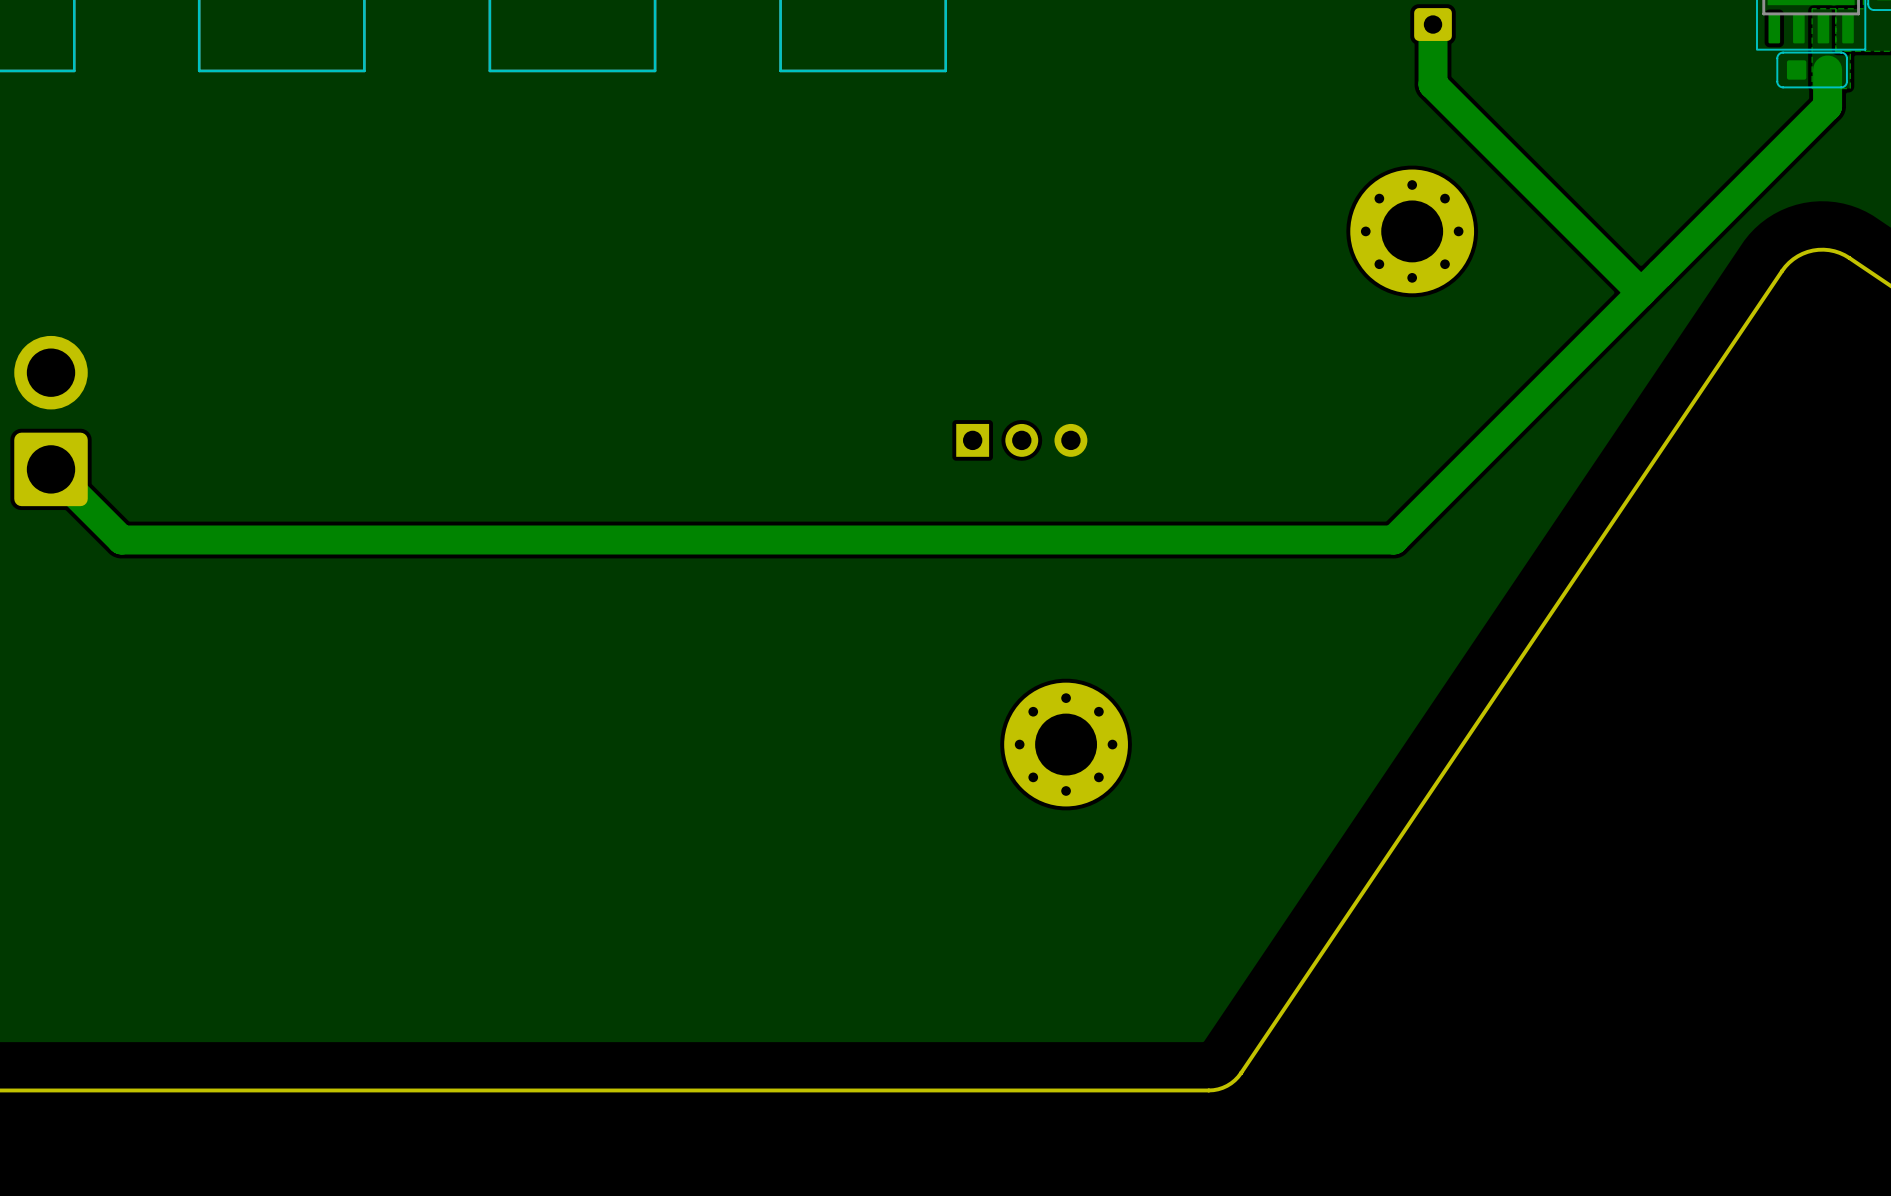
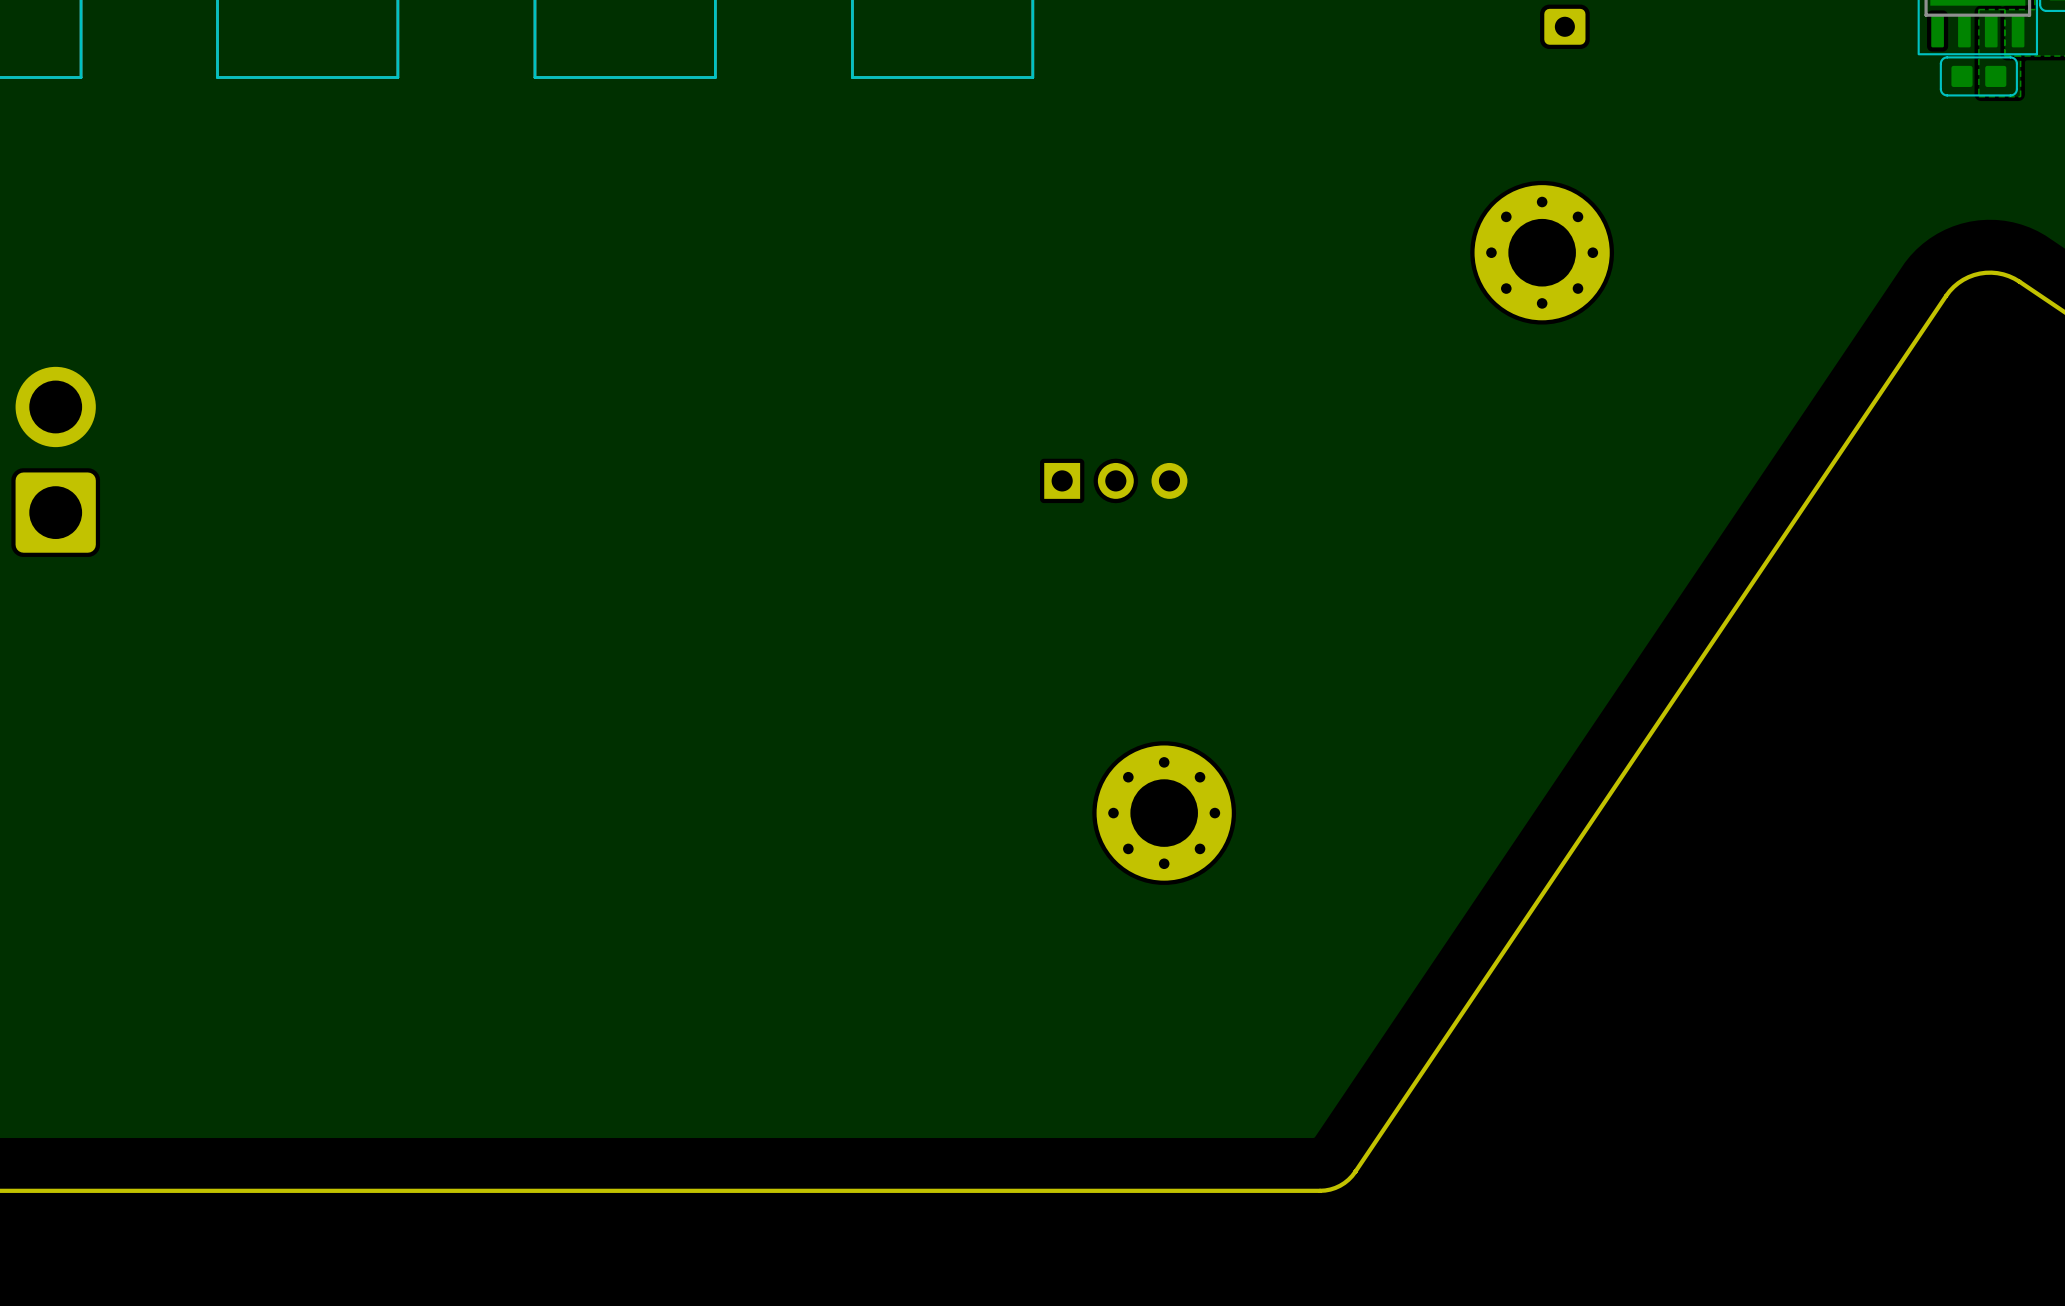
track: (1433, 24) (1433, 84) (1641, 292) -> none
track: (1827, 69) (1827, 106) (1393, 540) (121, 540) (51, 469) -> none

